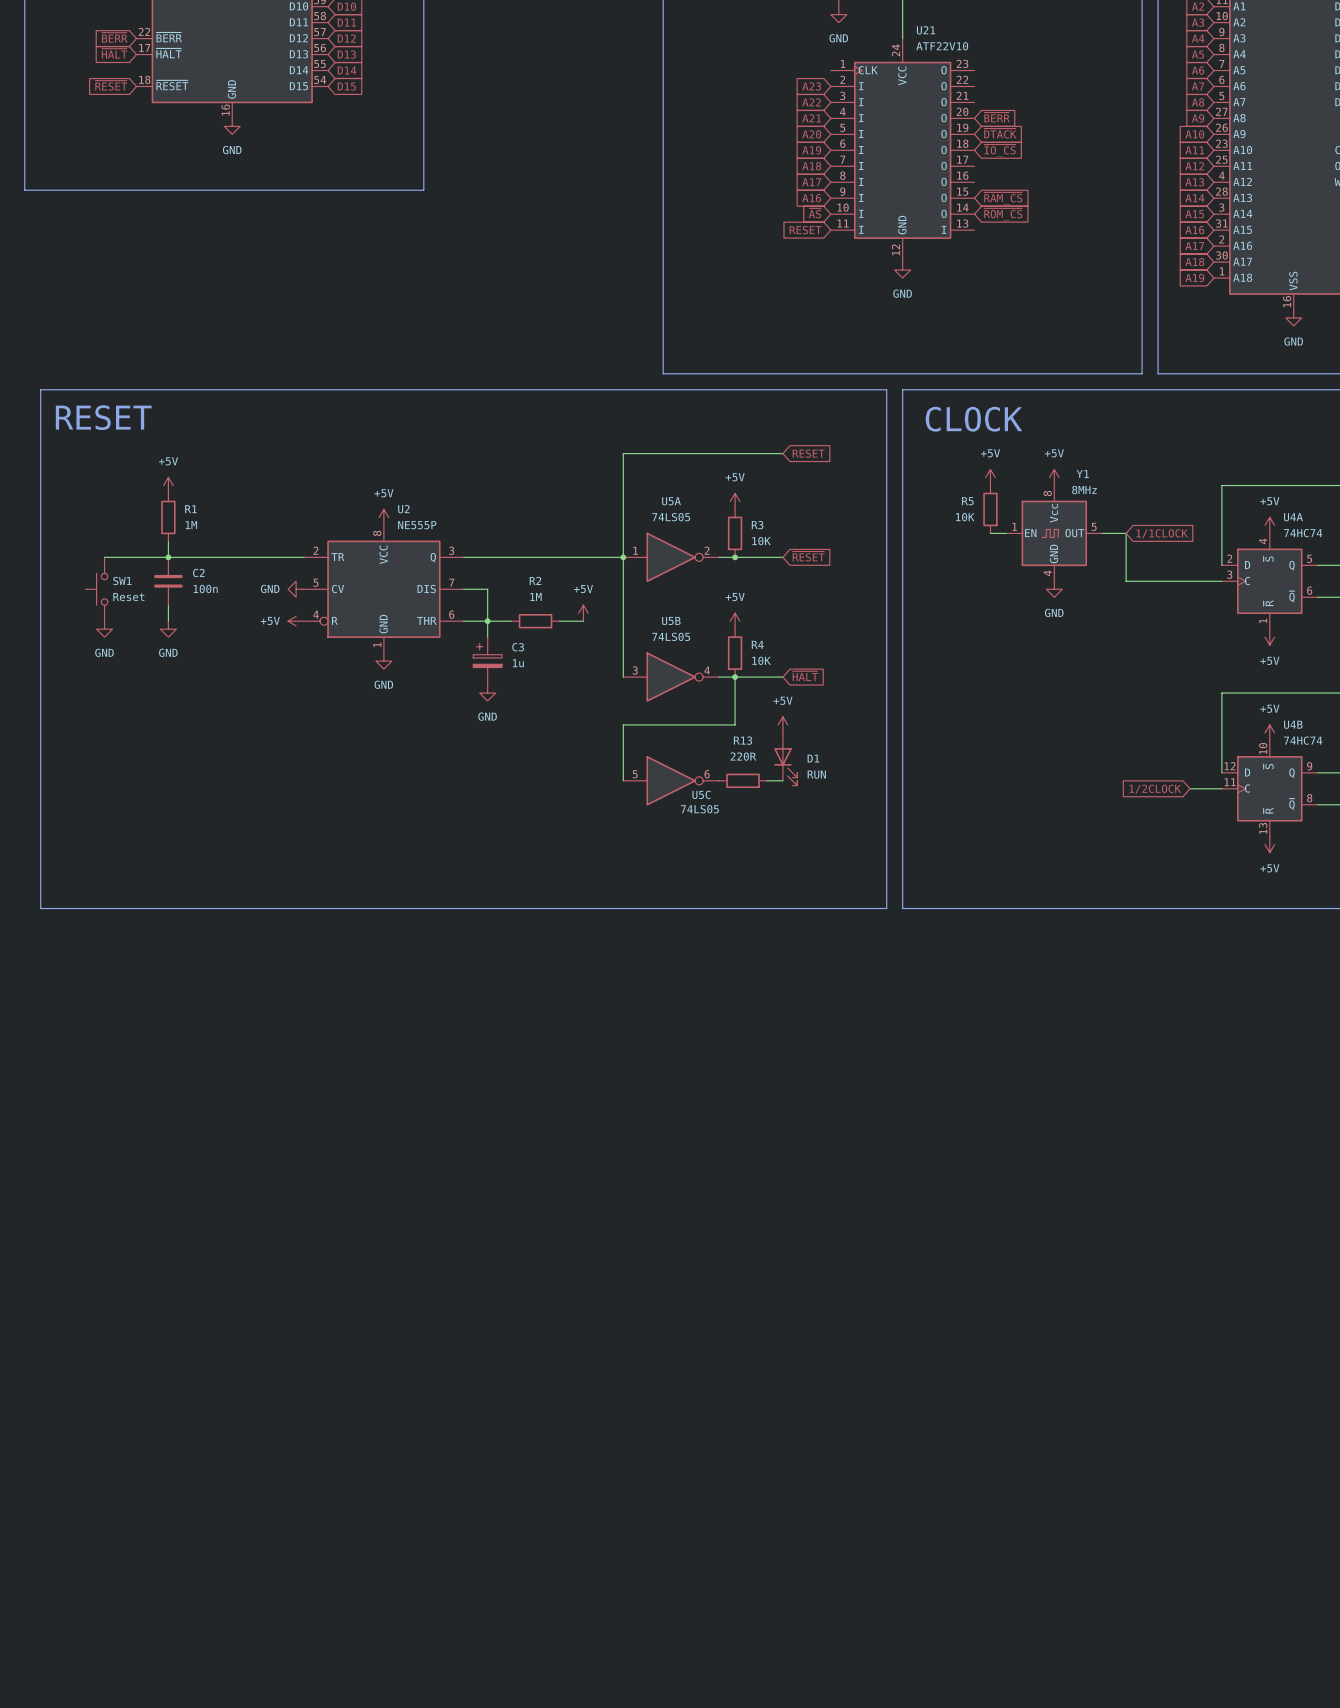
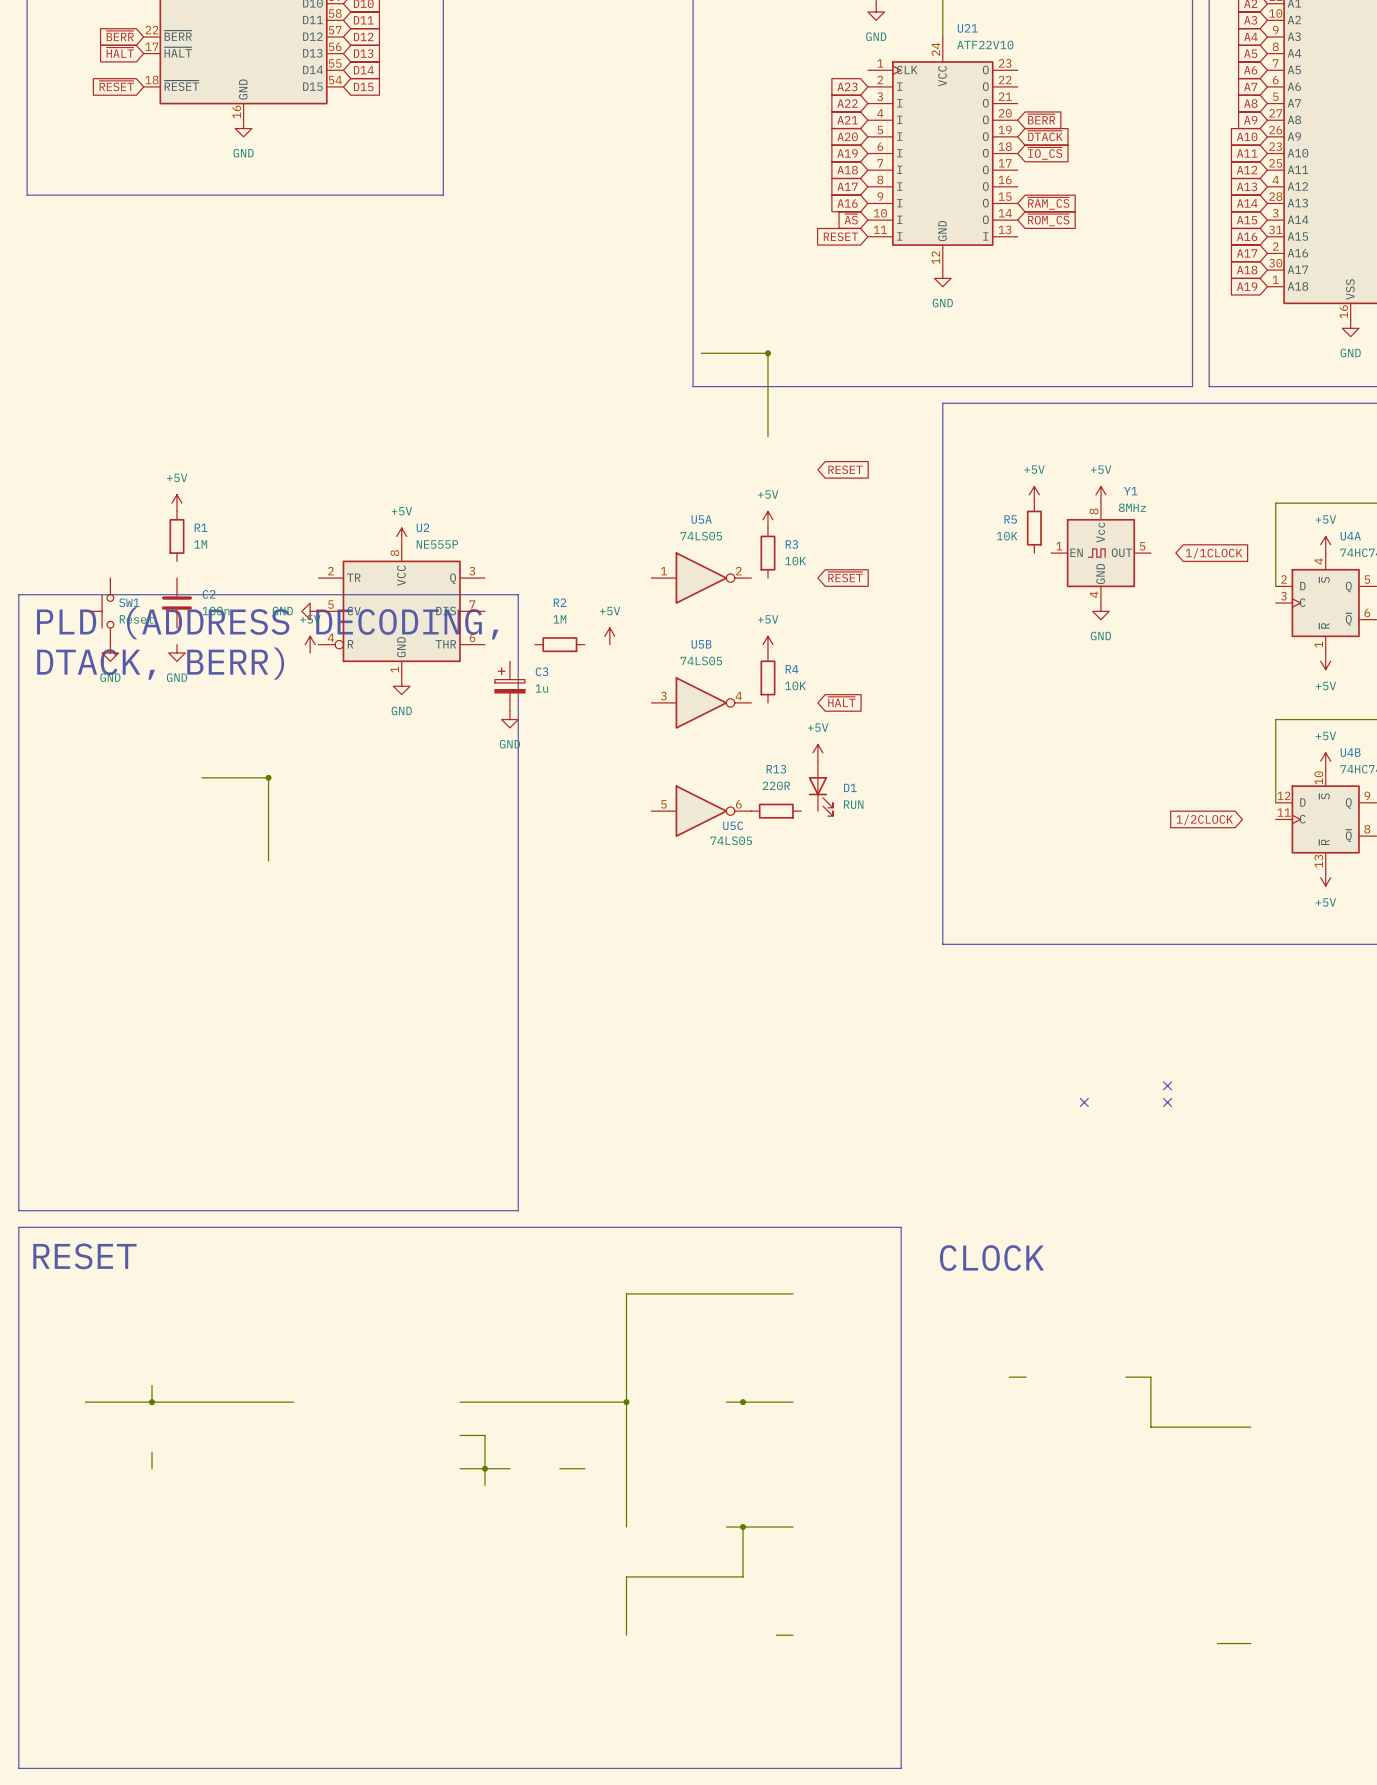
wire: none -> (701, 353) (767, 353) (767, 436)
junction: none -> (767, 353)
line: (40, 389) (886, 389) (886, 908) (40, 908) (40, 389) -> none
text: RESET (103, 417) -> none
text: CLOCK (973, 419) -> none
wire: (782, 453) (623, 453) (623, 677) -> none
wire: (990, 533) (1006, 533) -> none
wire: (1102, 533) (1126, 533) (1126, 581) (1221, 581) -> none
wire: (168, 541) (168, 557) -> none
wire: (104, 557) (304, 557) -> none
junction: (168, 557) -> none
wire: (463, 557) (623, 557) -> none
junction: (623, 557) -> none
wire: (719, 557) (782, 557) -> none
junction: (735, 557) -> none
line: none -> (18, 594) (518, 594) (518, 1210) (18, 1210) (18, 594)
wire: (463, 589) (487, 589) (487, 637) -> none
text: none -> PLD (ADDRESS DECODING, (267, 623)
wire: (168, 605) (168, 621) -> none
power symbol rotation: 0° (296, 621) -> 90° clockwise (310, 644)
wire: (463, 621) (511, 621) -> none
junction: (487, 621) -> none
wire: (559, 621) (583, 621) -> none
text: none -> DTACK, BERR) (160, 663)
wire: (719, 677) (782, 677) -> none
wire: (735, 677) (735, 724) (623, 724) (623, 780) -> none
junction: (735, 677) -> none
wire: none -> (201, 777) (268, 777) (268, 861)
junction: none -> (268, 777)
wire: (766, 780) (782, 780) -> none
wire: (1189, 788) (1221, 788) -> none
no-connect mark: none -> (1167, 1085)
no-connect mark: none -> (1084, 1102)
no-connect mark: none -> (1167, 1102)
line: none -> (18, 1227) (18, 1768) (901, 1768) (901, 1227) (18, 1227)
text: none -> RESET (84, 1256)
text: none -> CLOCK (991, 1258)
wire: none -> (792, 1293) (626, 1293) (626, 1527)
wire: none -> (1009, 1377) (1026, 1377)
wire: none -> (1125, 1377) (1150, 1377) (1150, 1427) (1250, 1427)
wire: none -> (152, 1385) (152, 1402)
wire: none -> (85, 1402) (293, 1402)
junction: none -> (152, 1402)
wire: none -> (459, 1402) (626, 1402)
junction: none -> (626, 1402)
wire: none -> (726, 1402) (792, 1402)
junction: none -> (743, 1402)
wire: none -> (459, 1435) (484, 1435) (484, 1485)
wire: none -> (152, 1452) (152, 1468)
wire: none -> (459, 1468) (509, 1468)
junction: none -> (484, 1468)
wire: none -> (559, 1468) (584, 1468)
wire: none -> (726, 1527) (792, 1527)
wire: none -> (743, 1527) (743, 1576) (626, 1576) (626, 1635)
junction: none -> (743, 1527)
wire: none -> (776, 1635) (792, 1635)
wire: none -> (1217, 1643) (1250, 1643)

